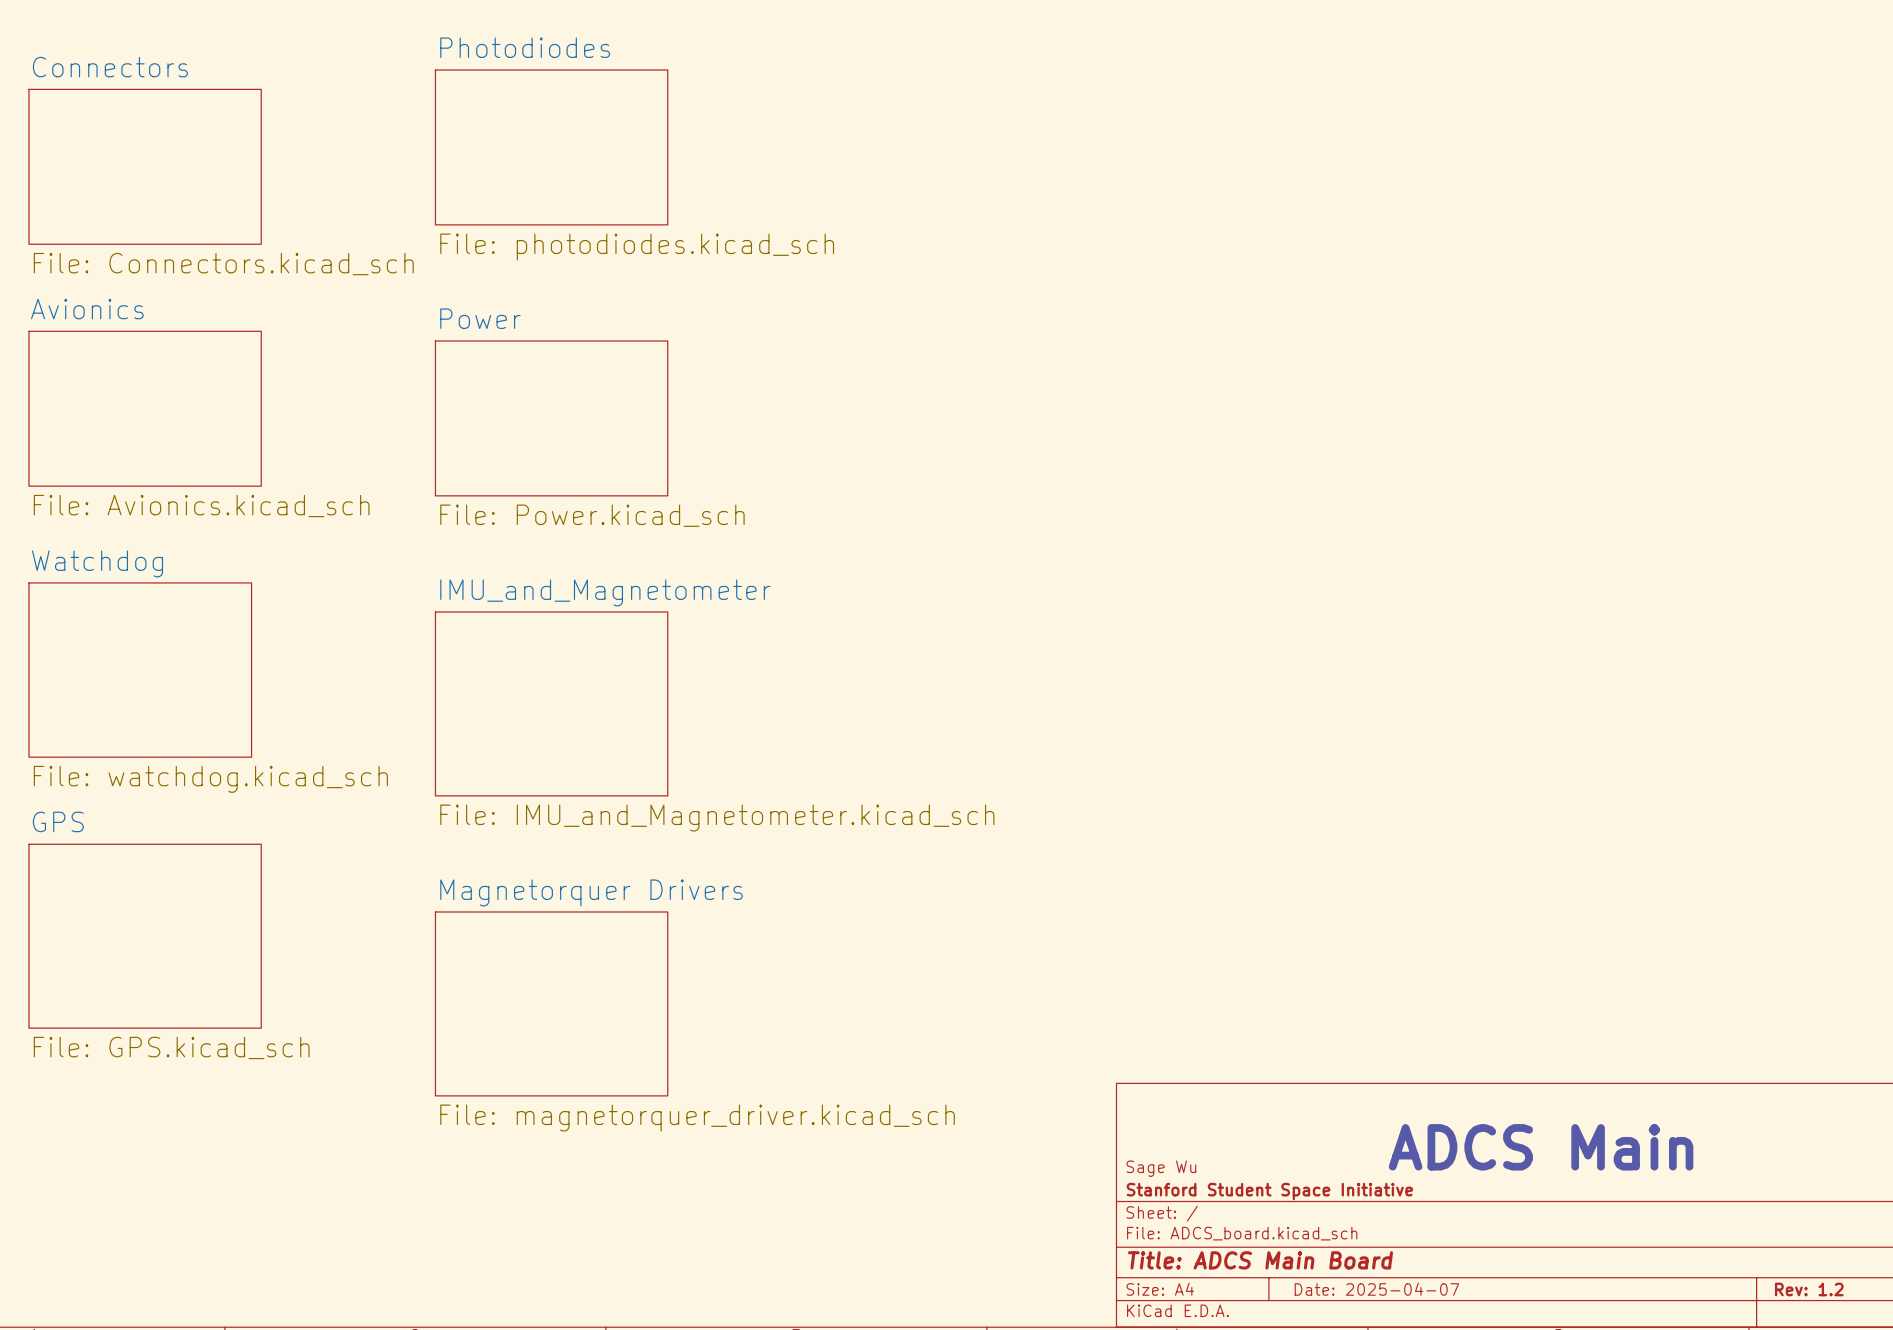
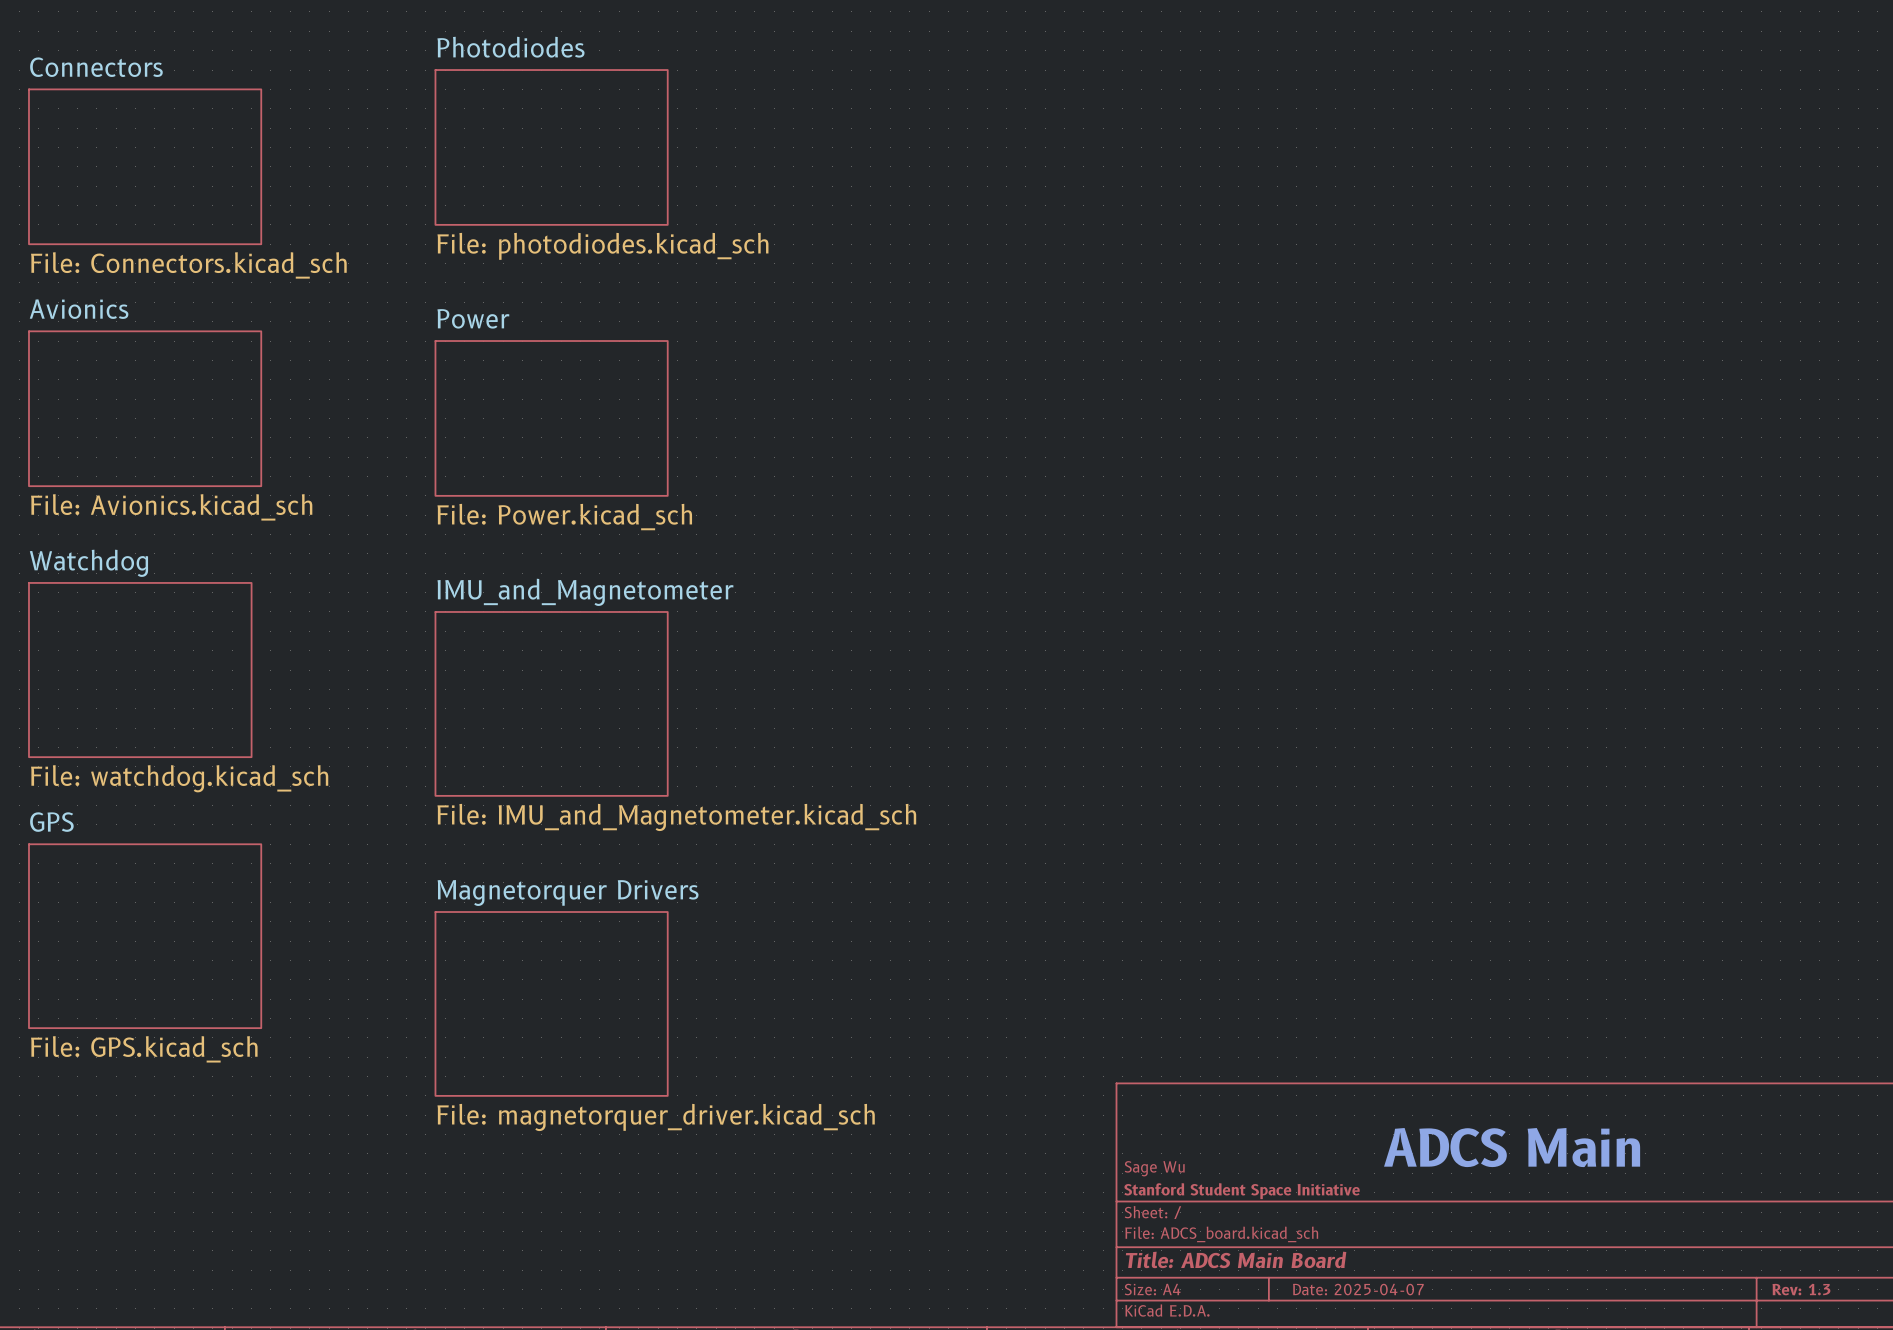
title block: Rev: 1.2 (1809, 1289) -> Rev: 1.3 (1801, 1289)

